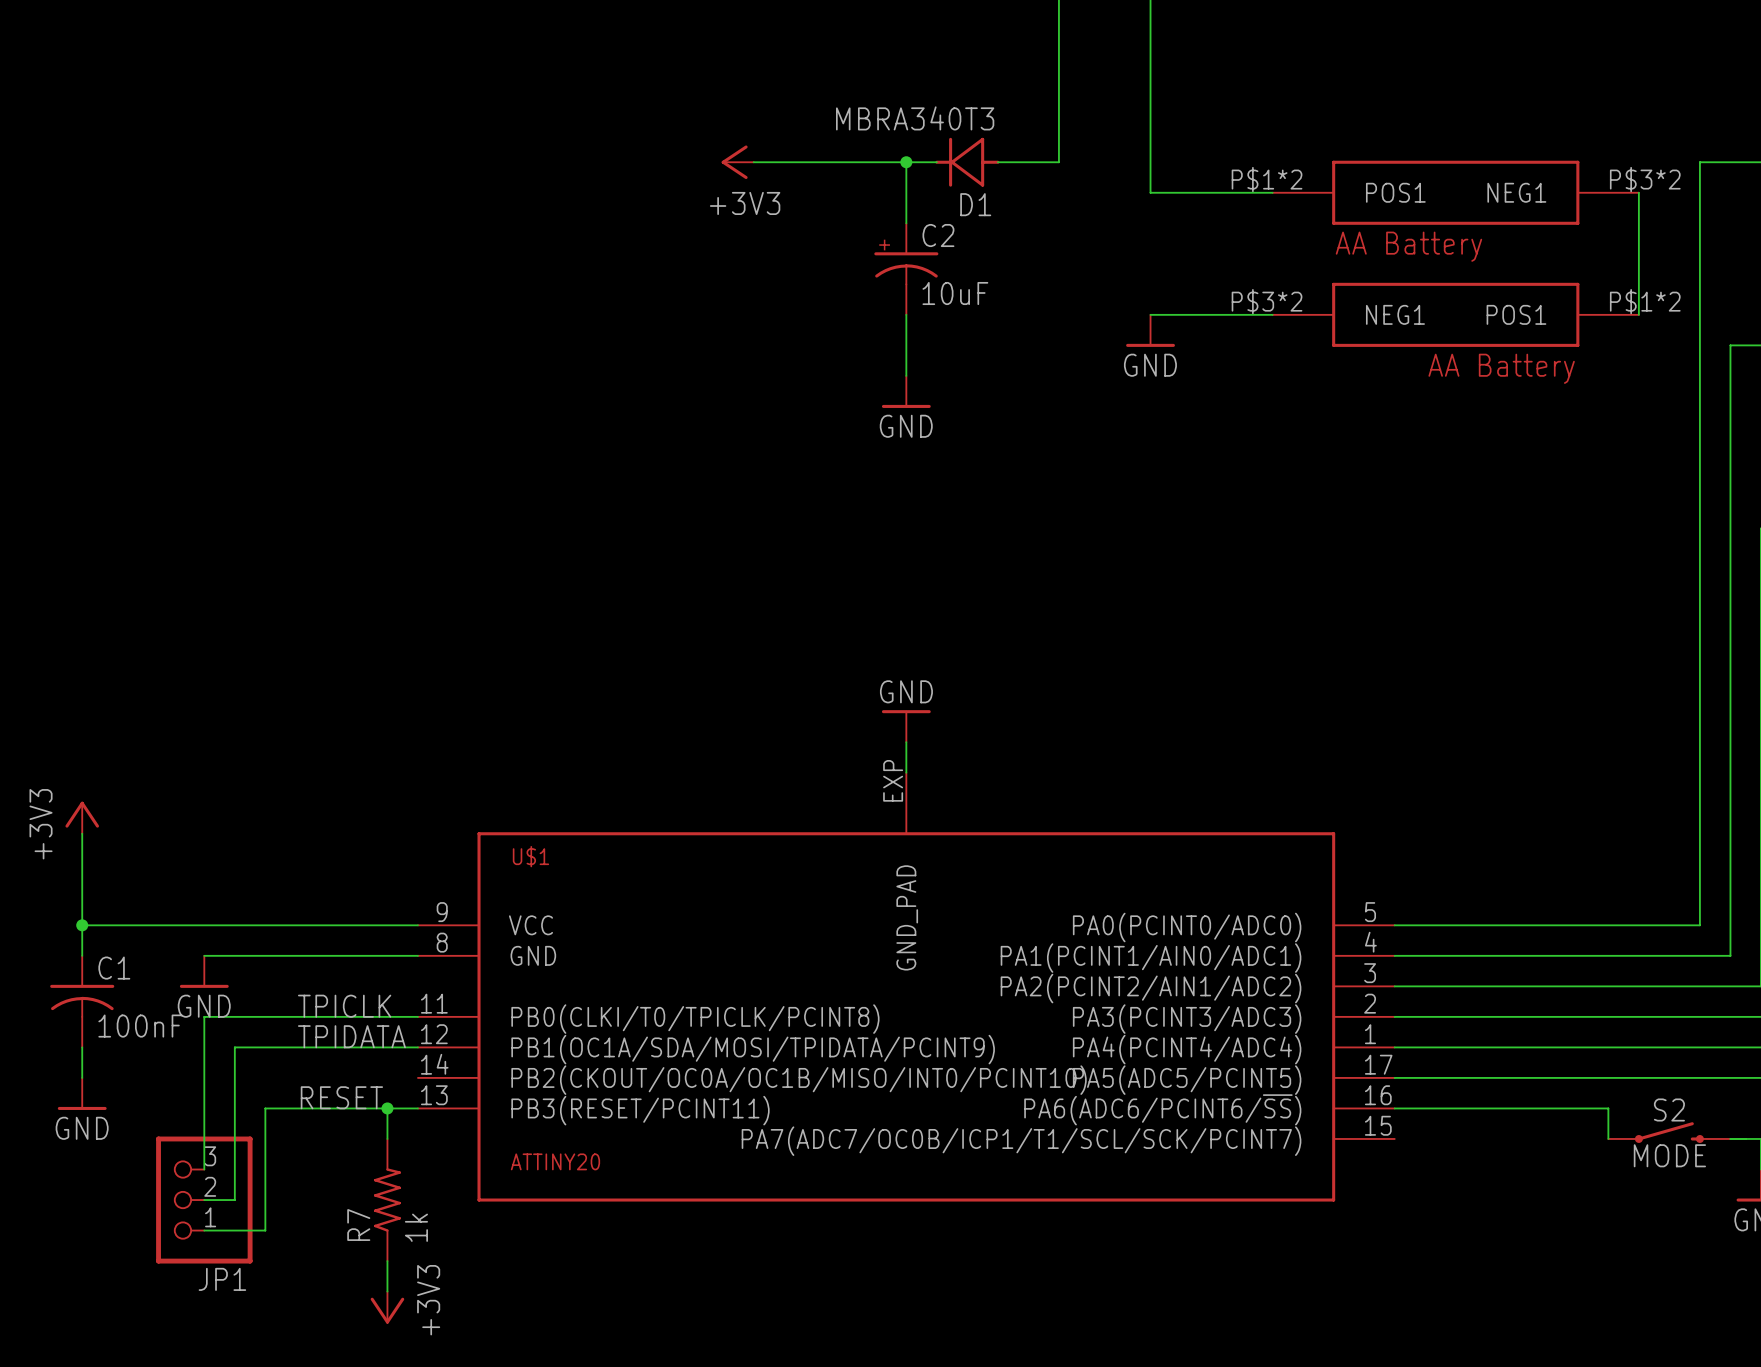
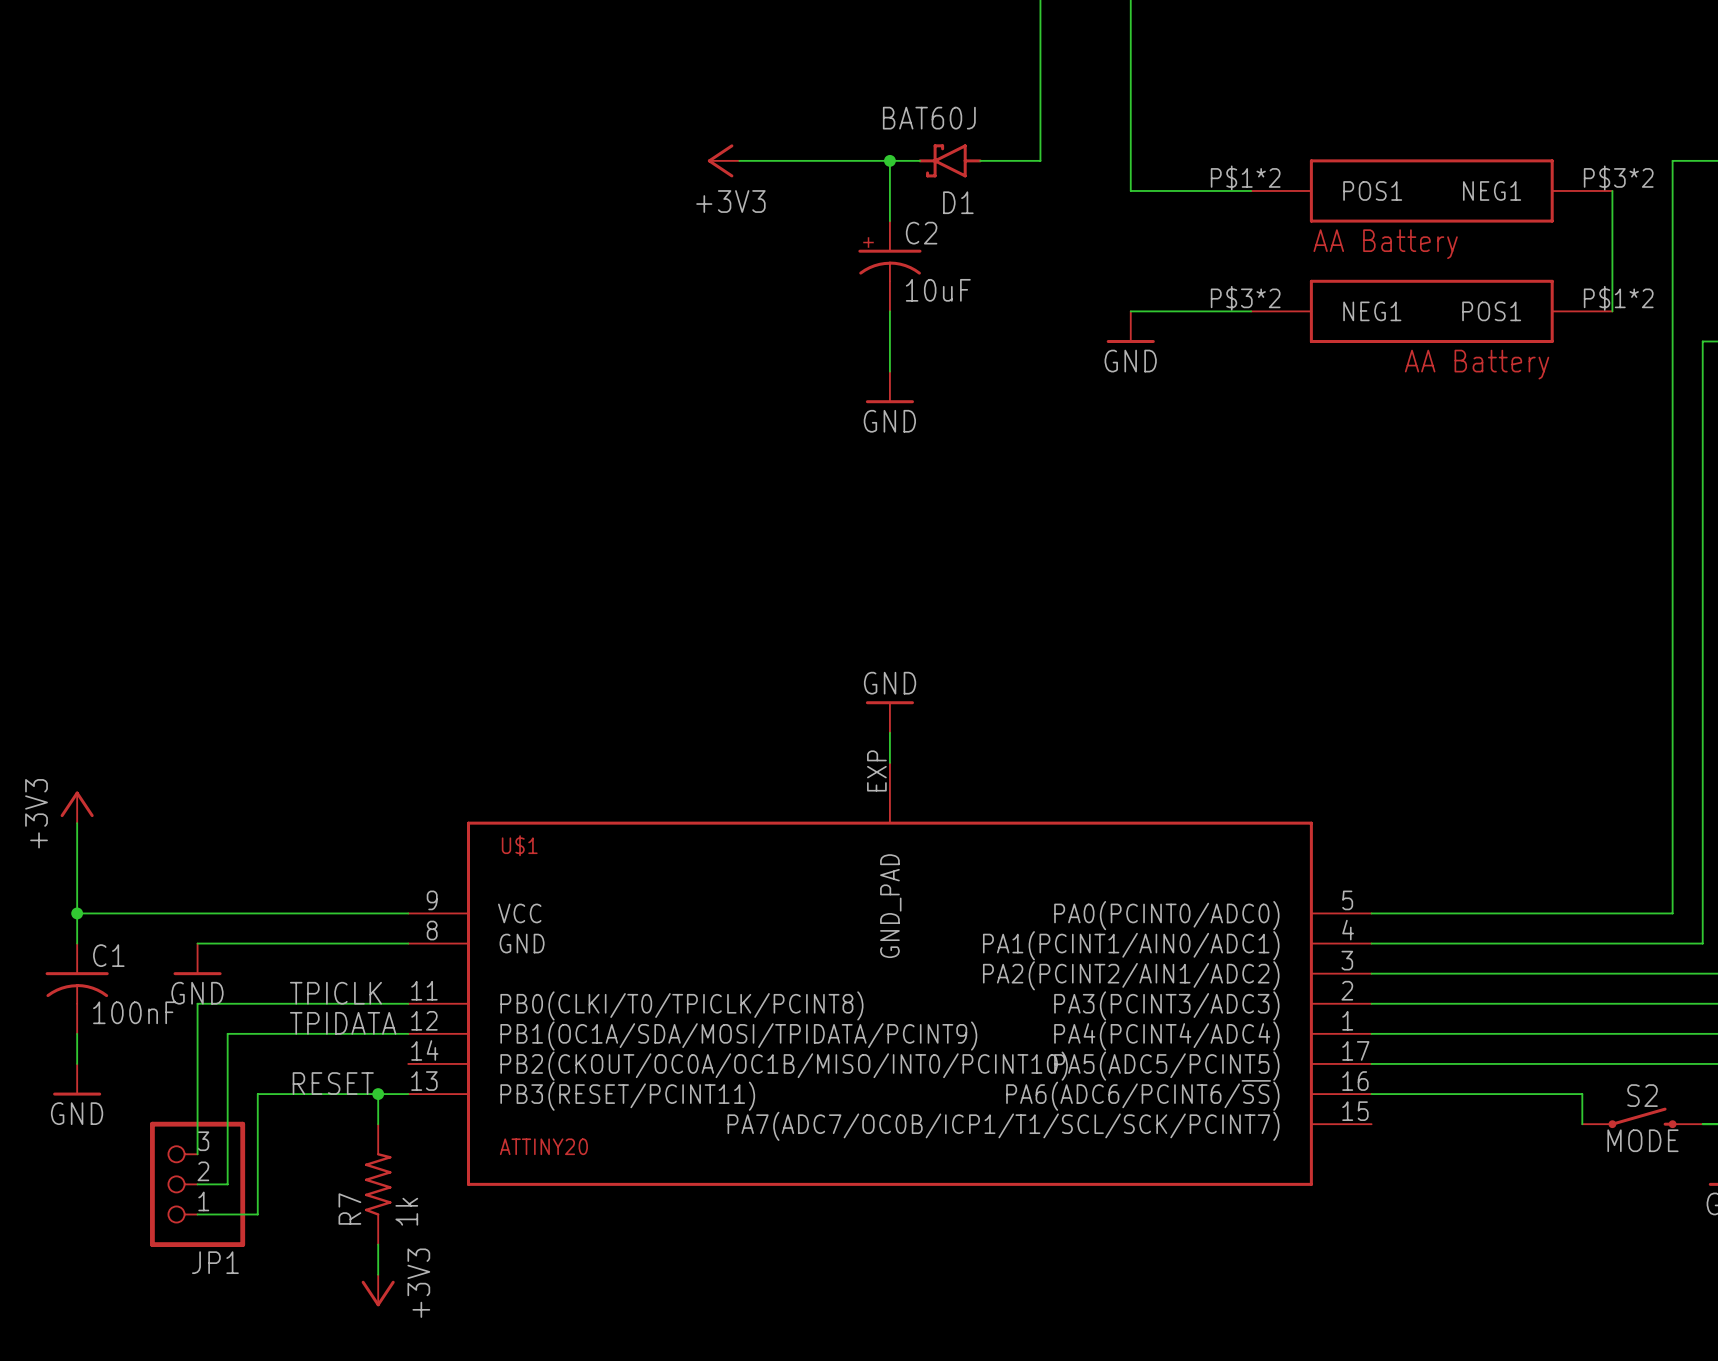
D1 value: MBRA340T3 (915, 118) -> BAT60J (929, 118)
D1 symbol: [935, 137, 1000, 187] -> [918, 144, 982, 178]

